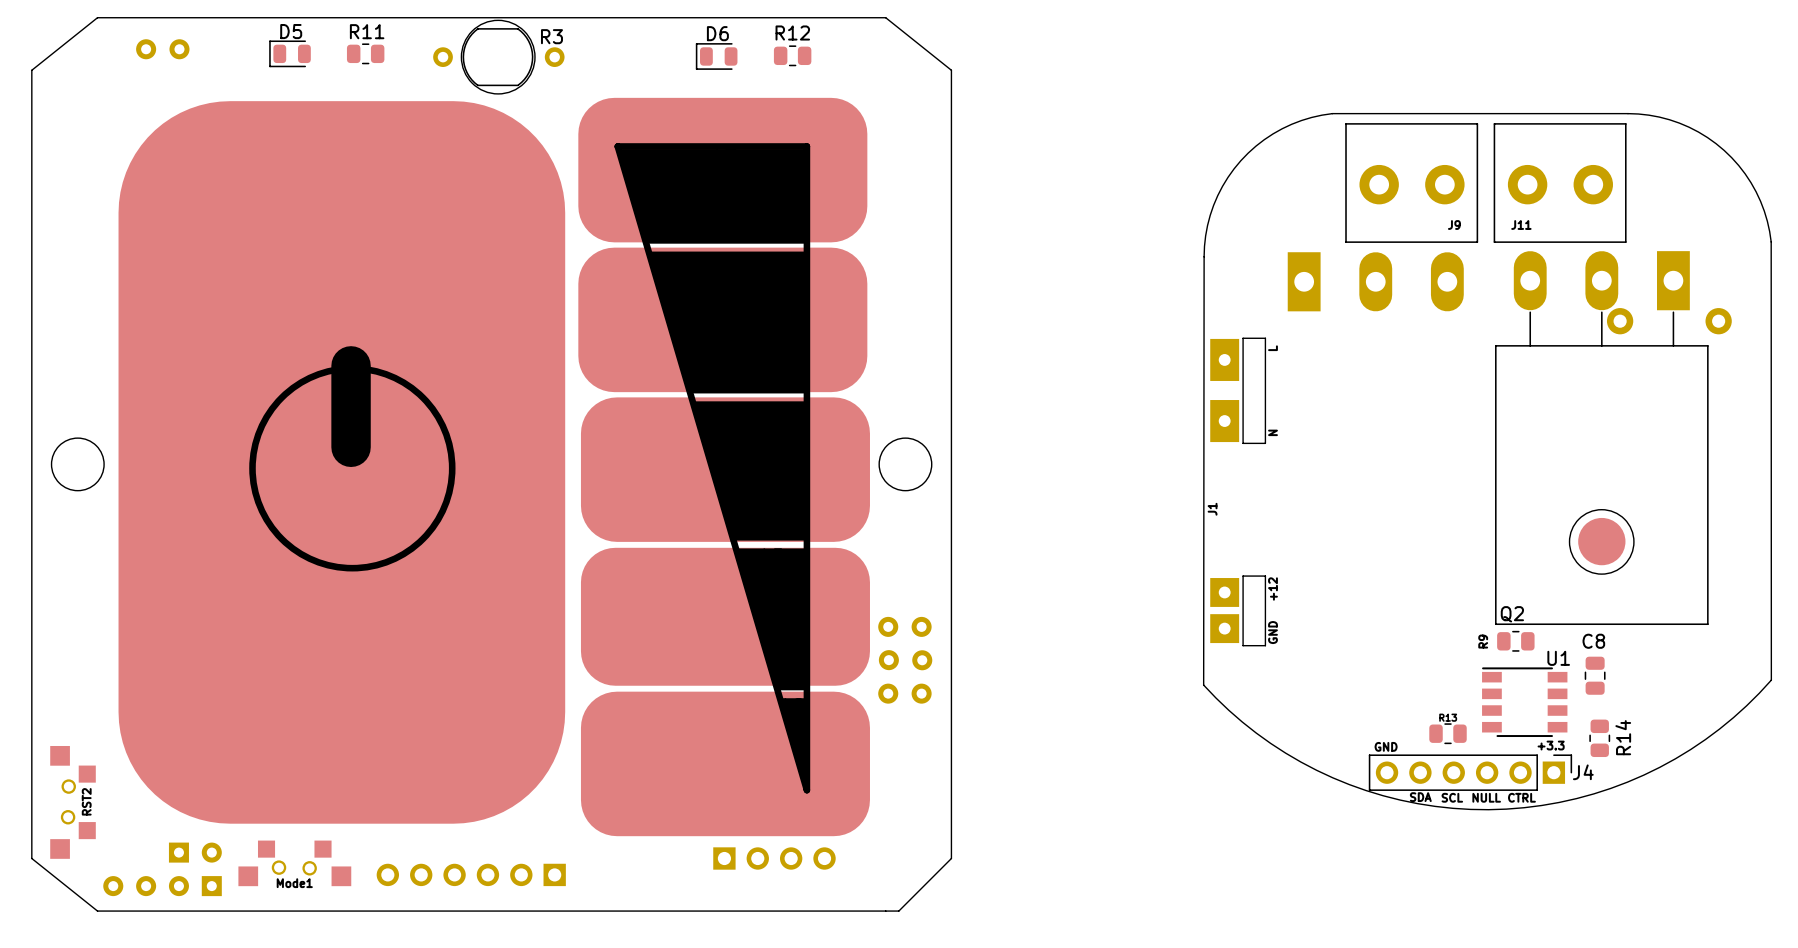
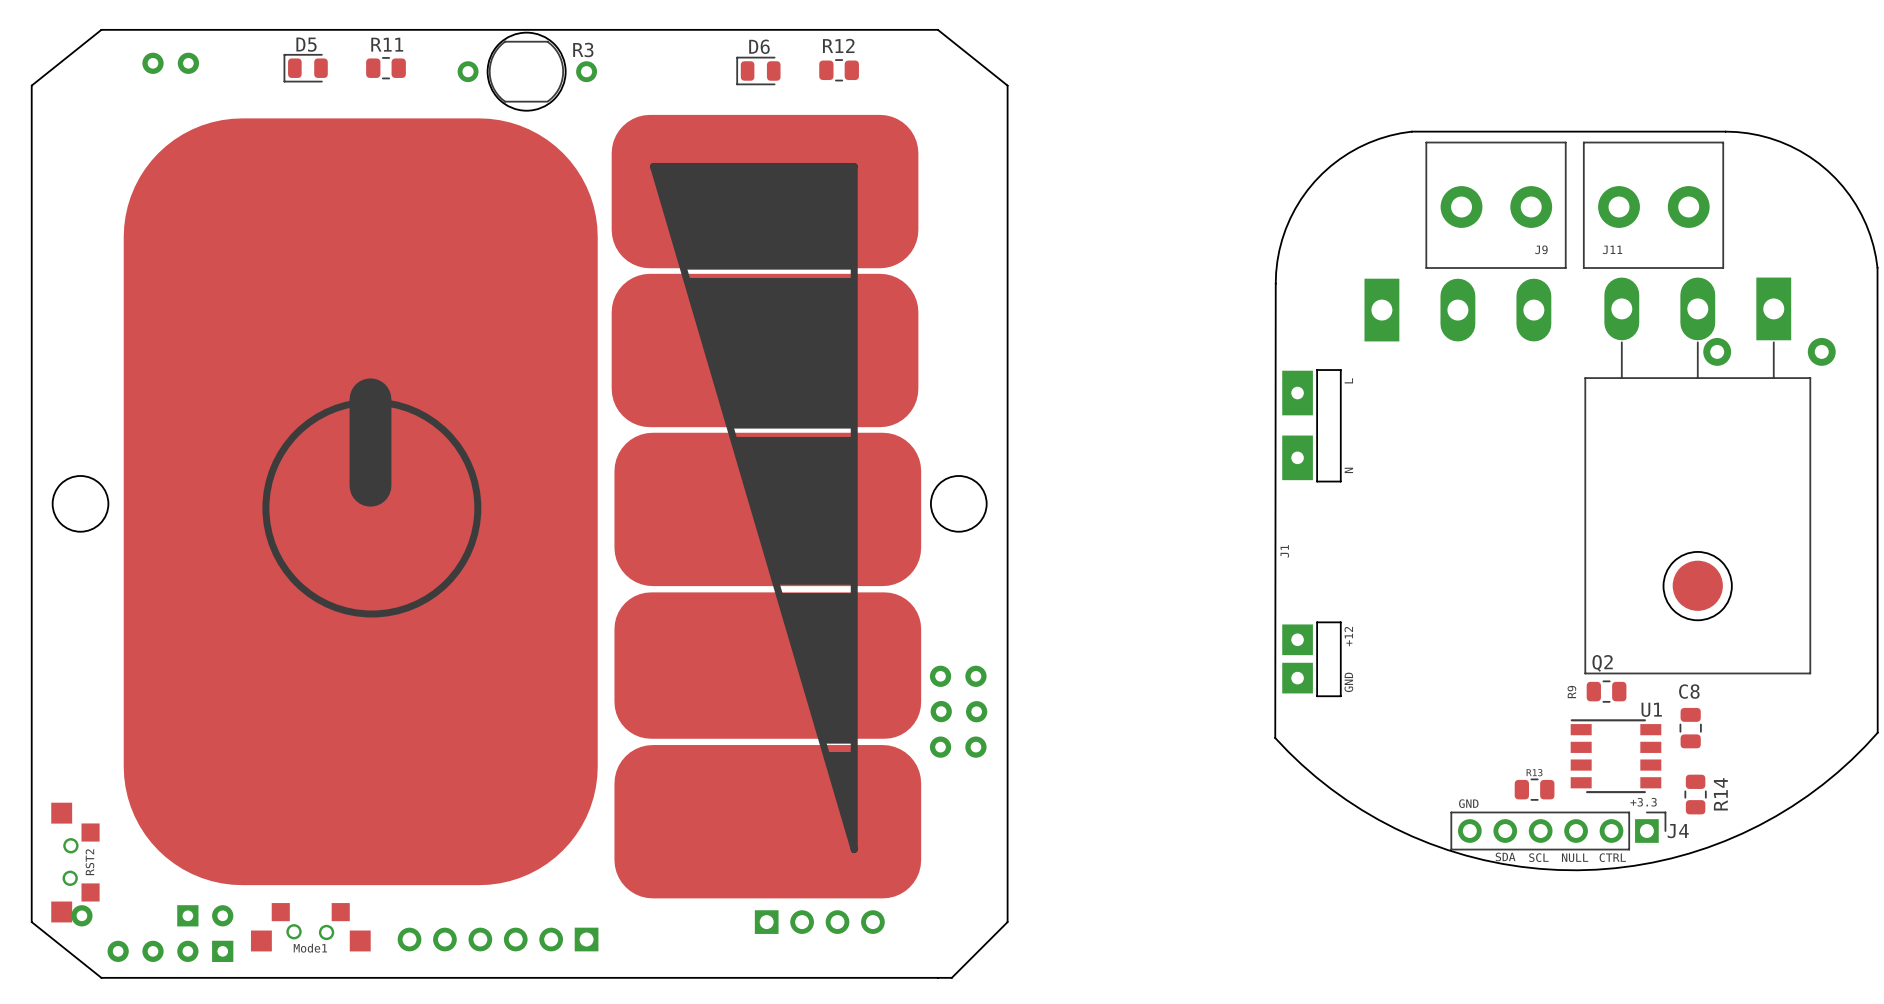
part: none -> (81, 915)

